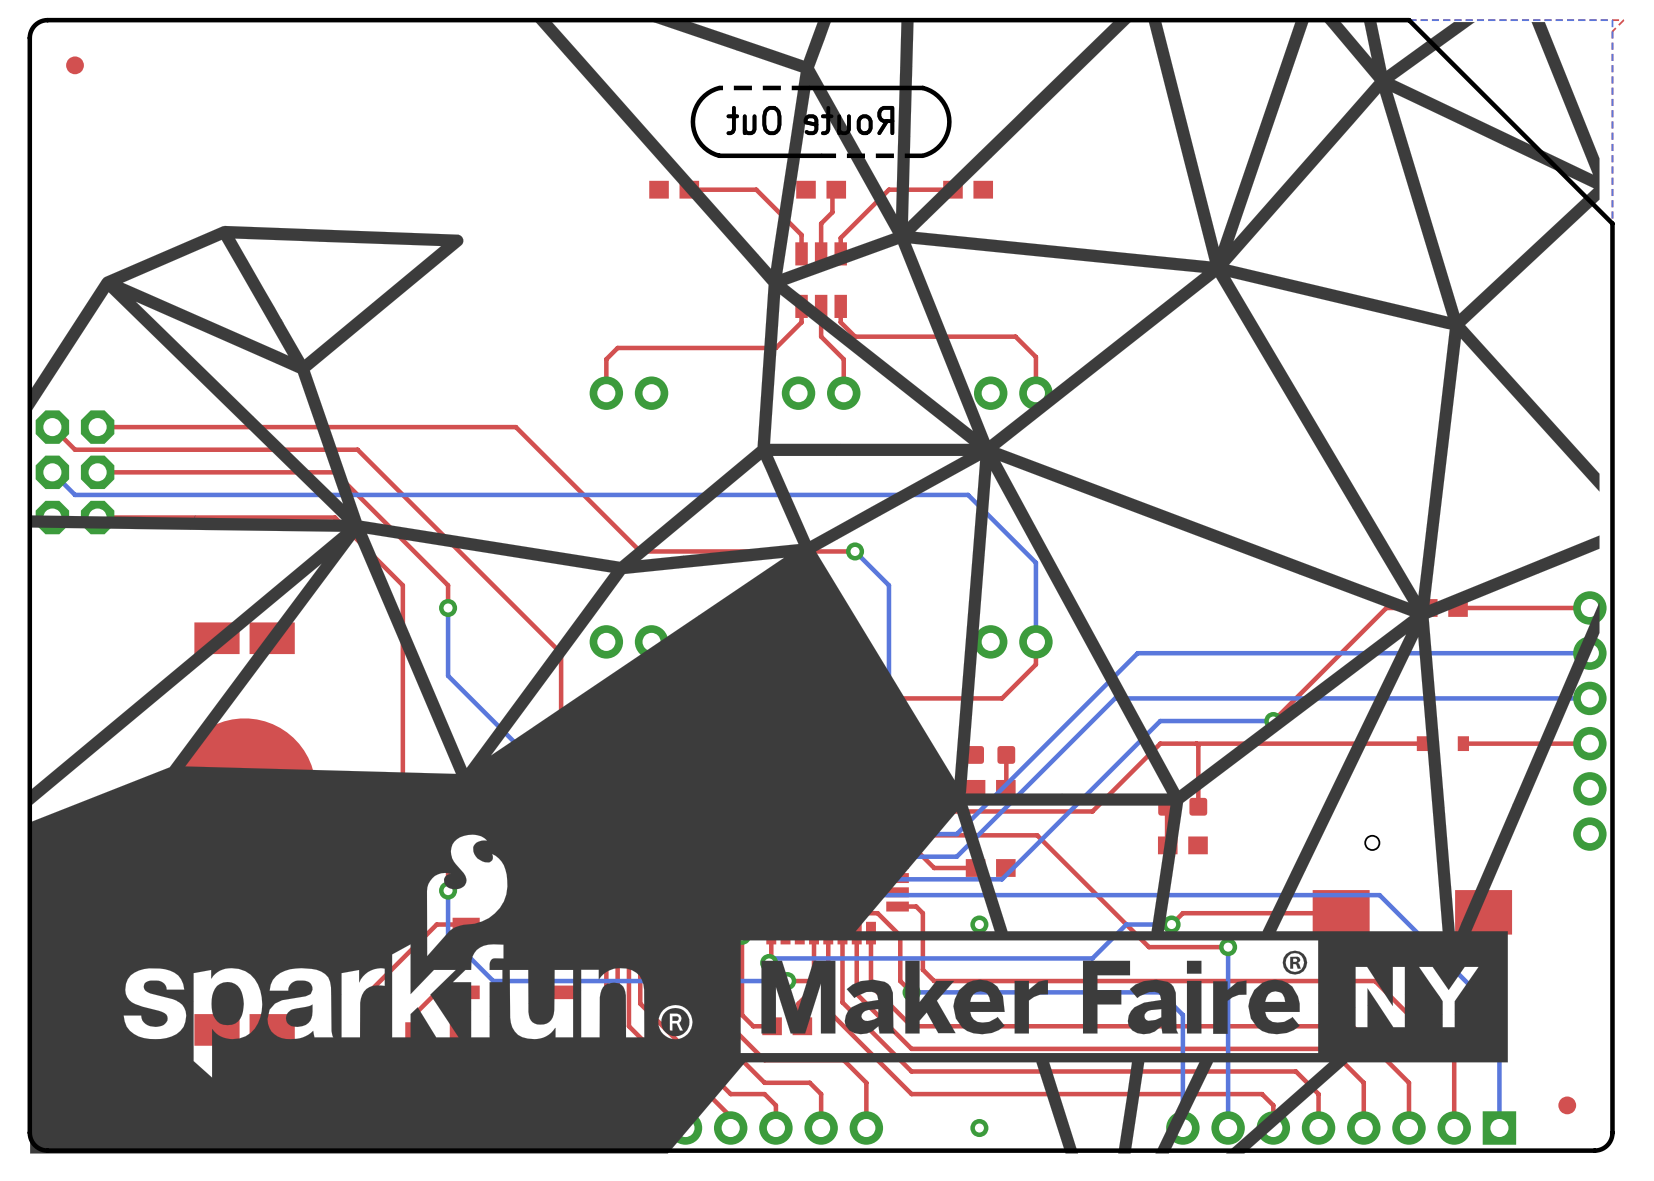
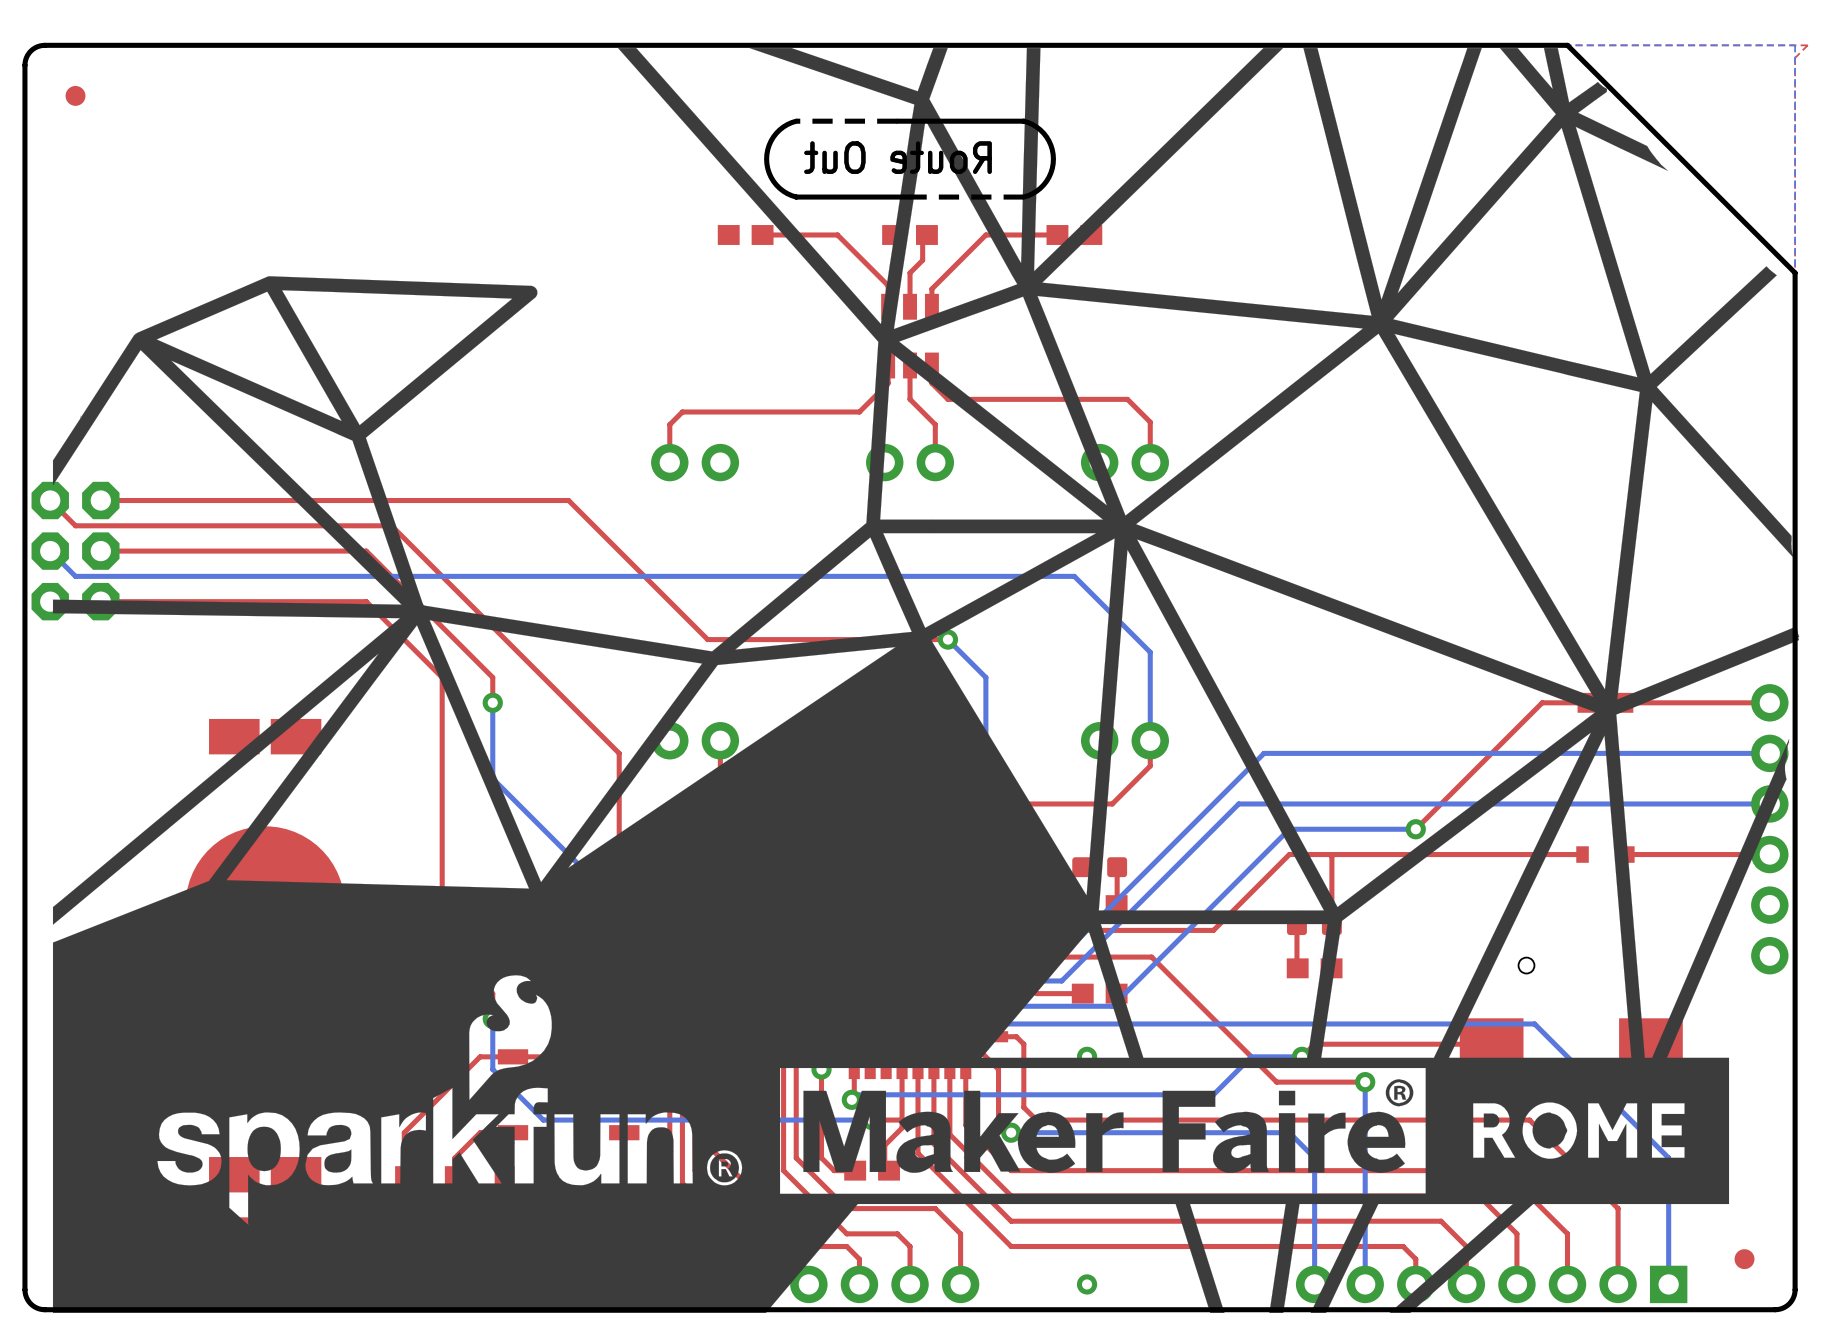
drawing: [30, 22, 1600, 1154] -> none
drawing: none -> [52, 48, 1800, 1313]

